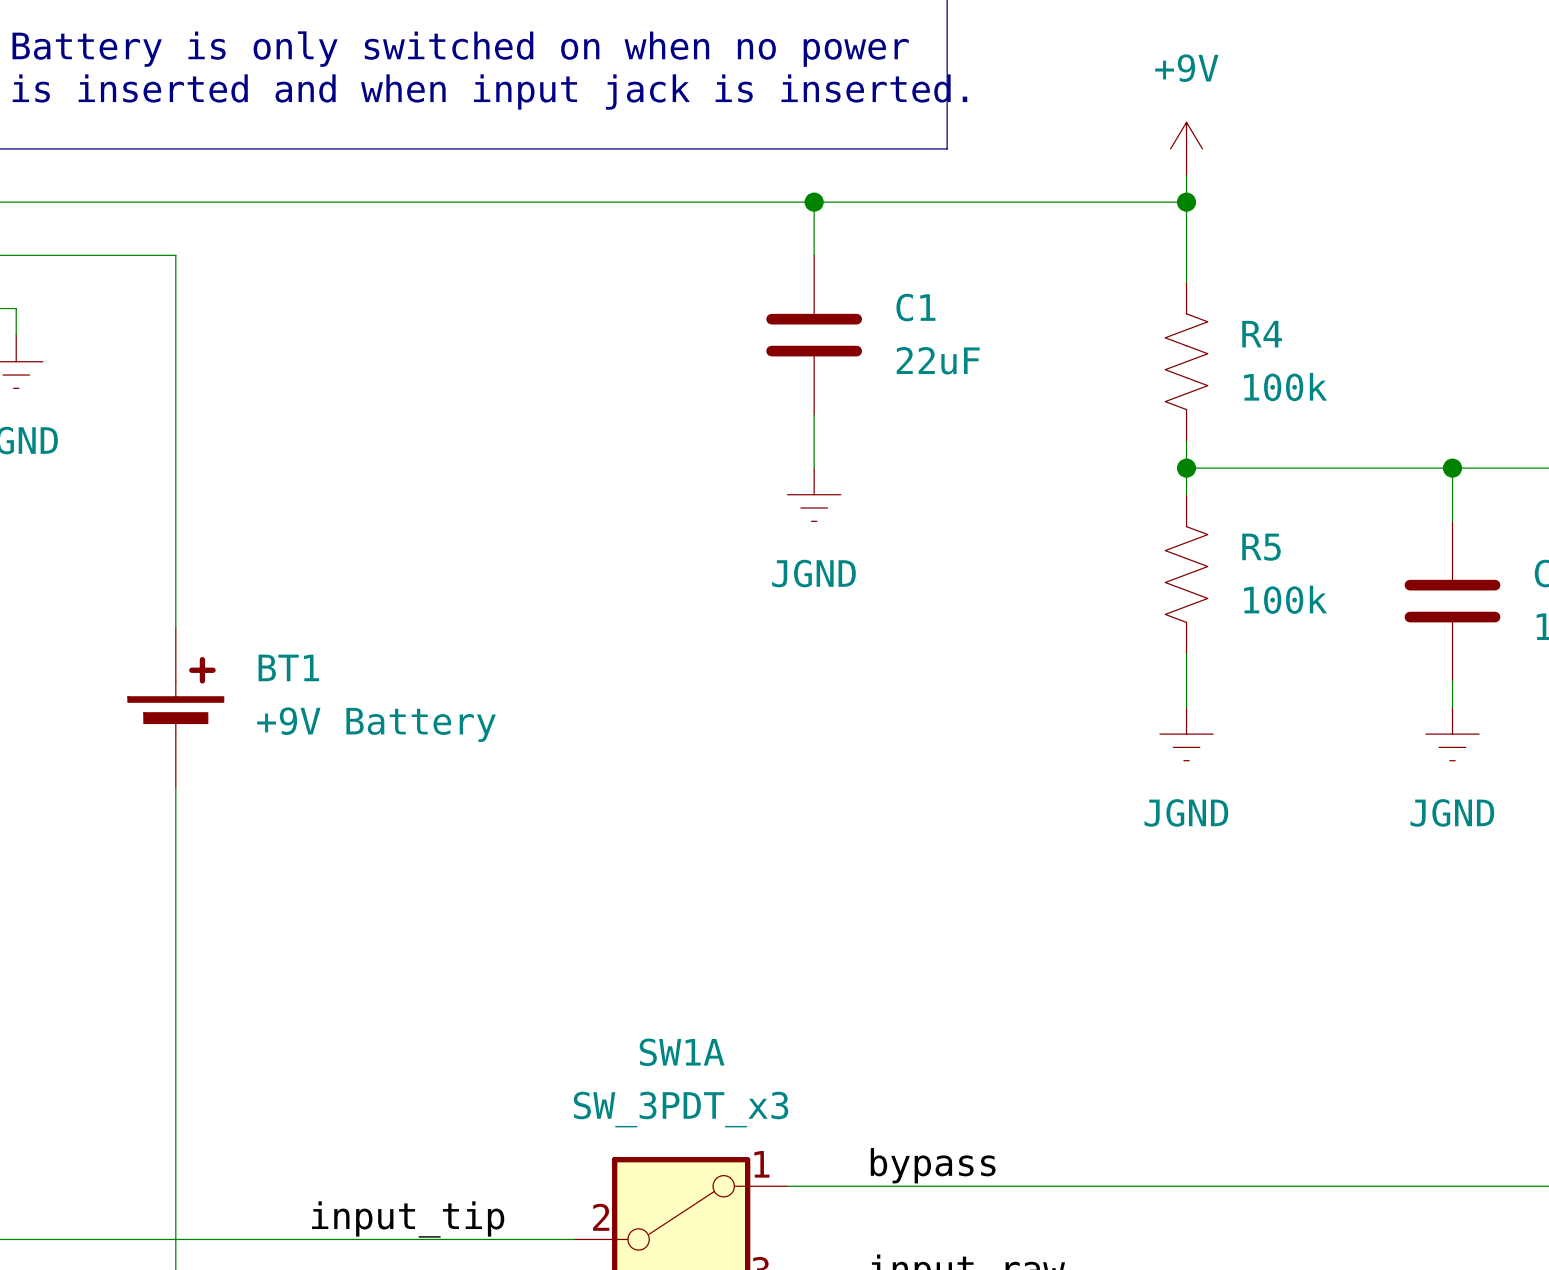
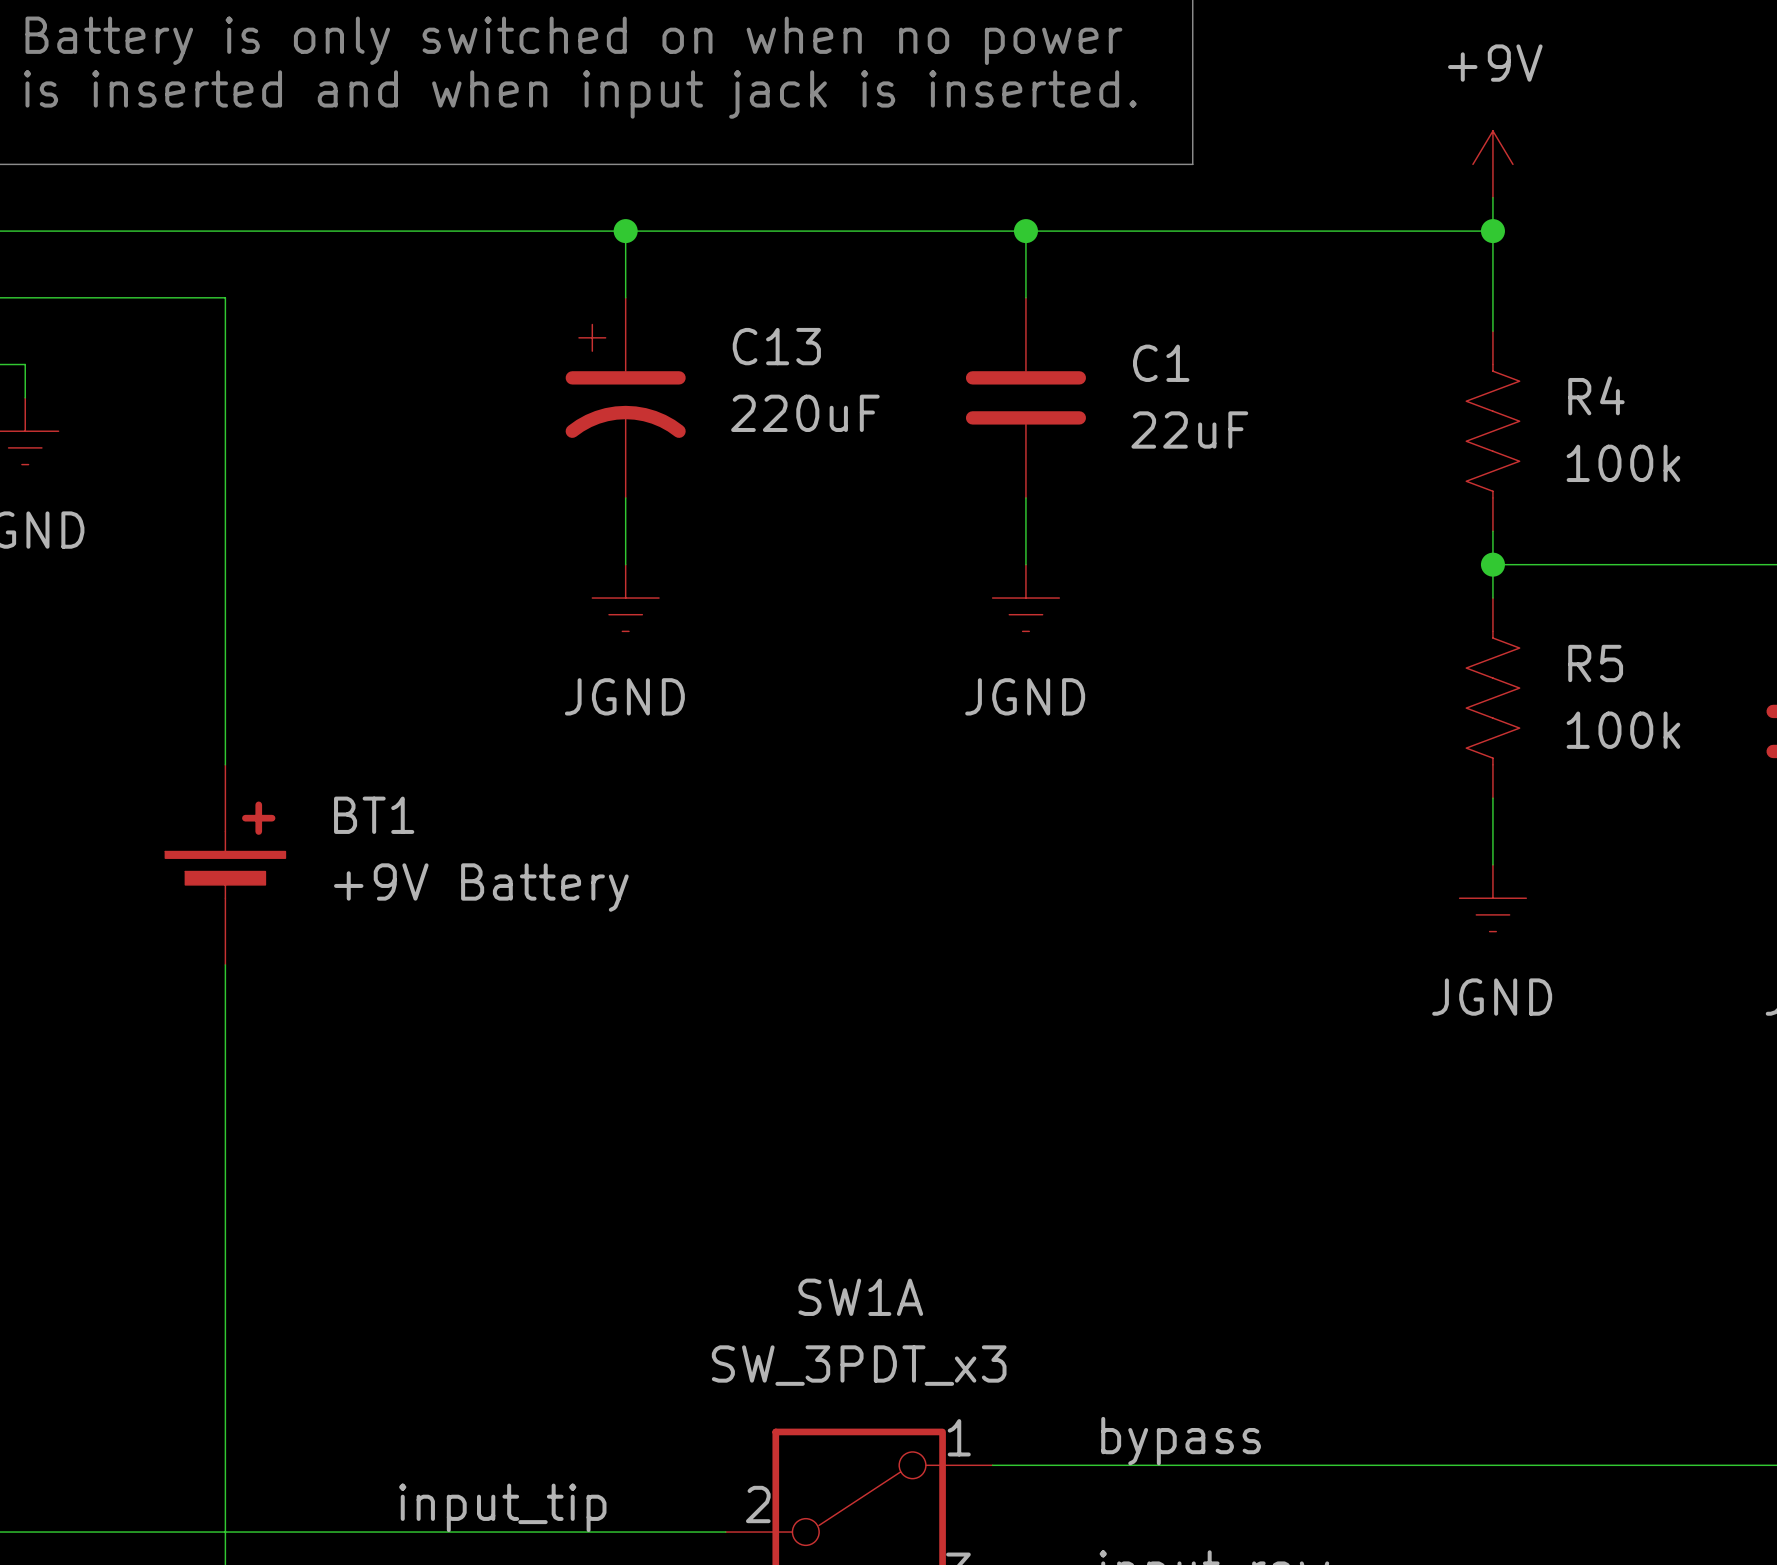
wire: none -> (625, 231) (625, 297)
junction: none -> (625, 231)
C13: none -> 220uF (625, 397)
wire: none -> (625, 497) (625, 564)
power symbol: none -> JGND (625, 598)

